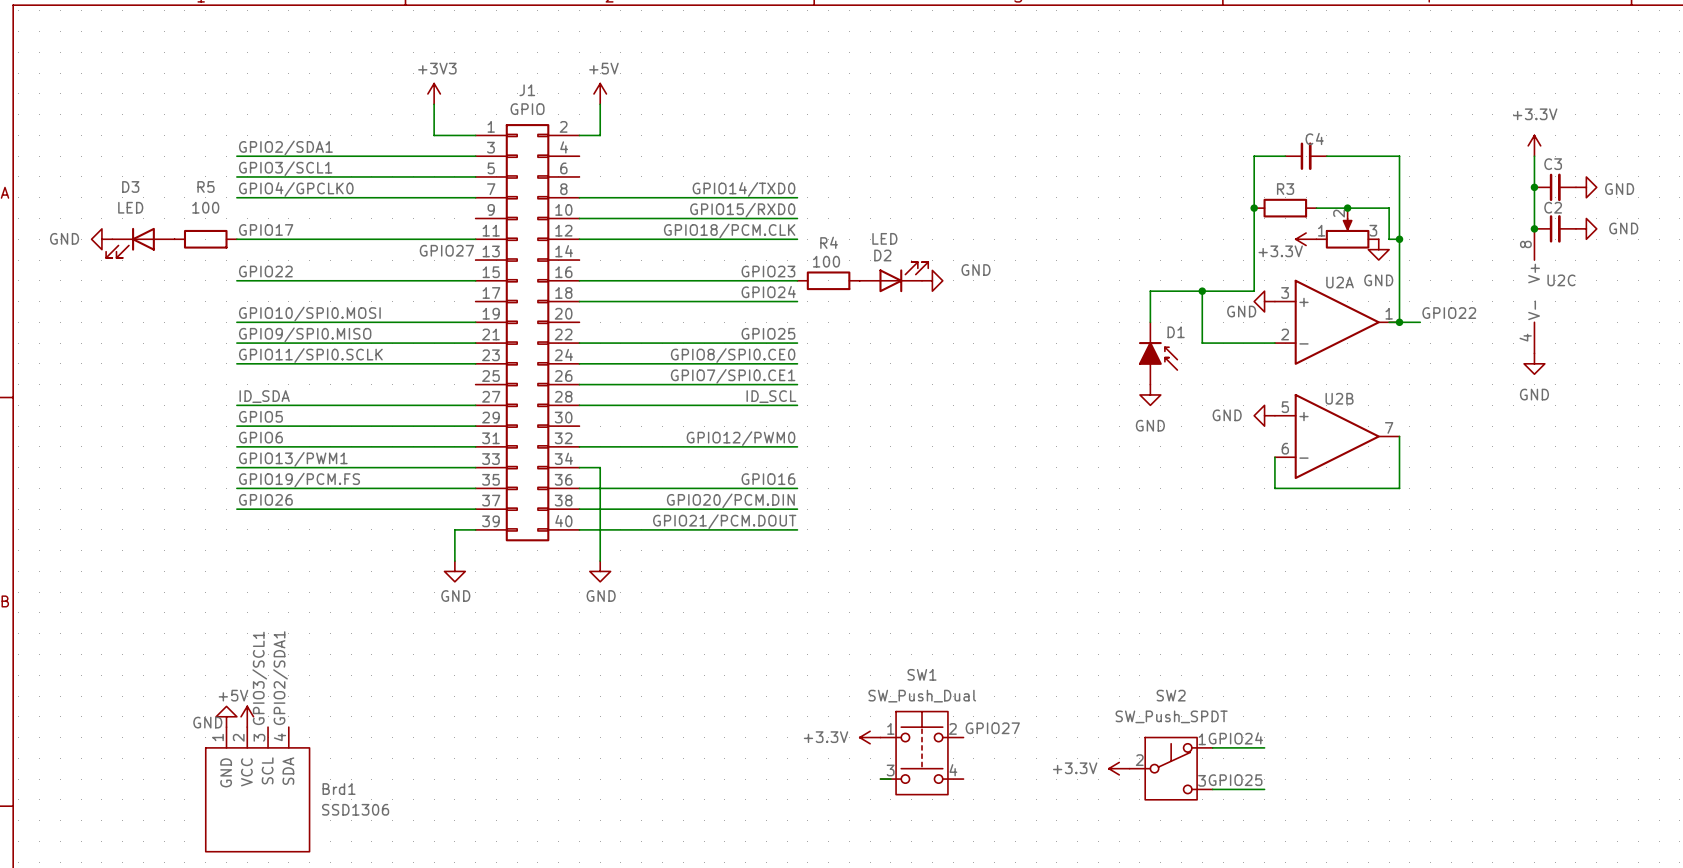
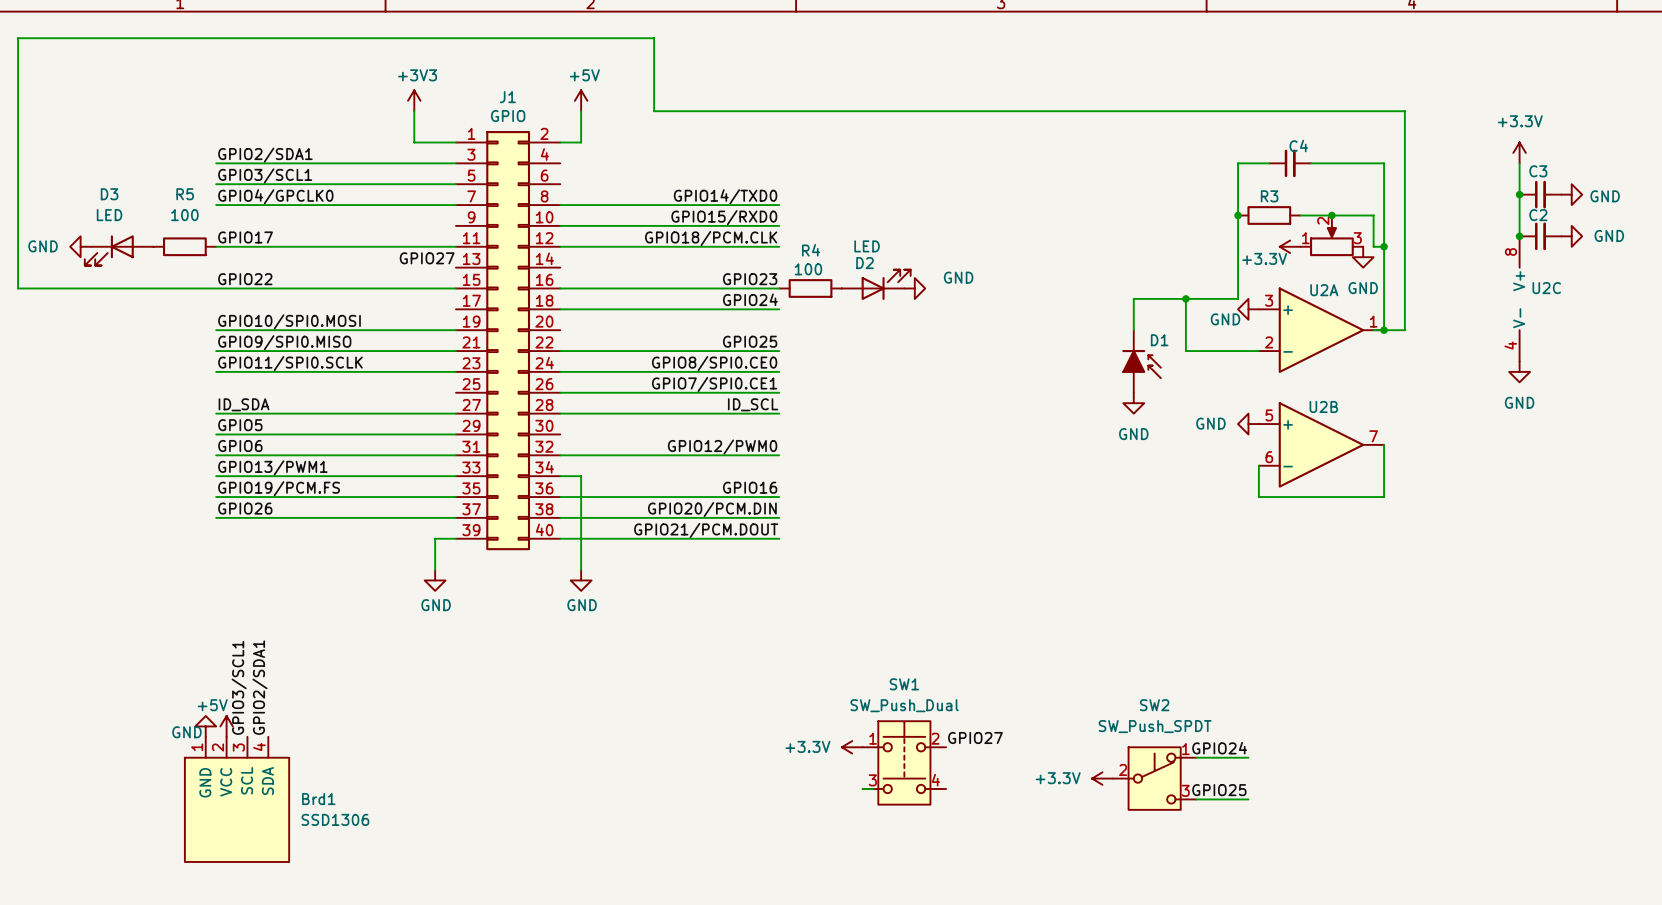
wire: none -> (216, 288) (18, 288) (18, 38) (654, 38) (654, 111) (1404, 111) (1404, 330)
label: GPIO22 (1449, 313) -> none

